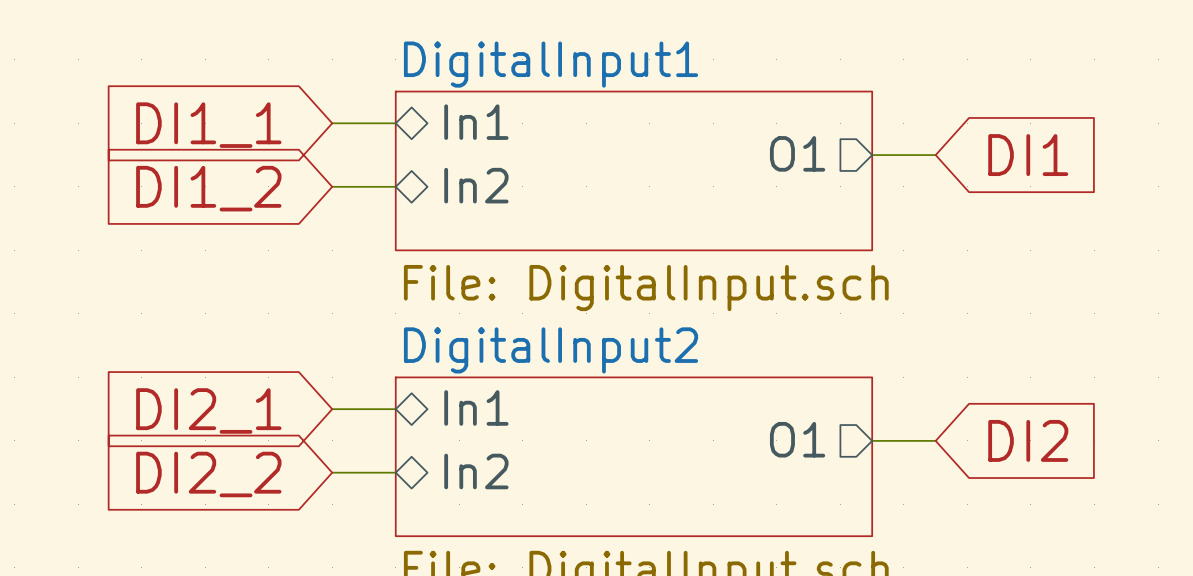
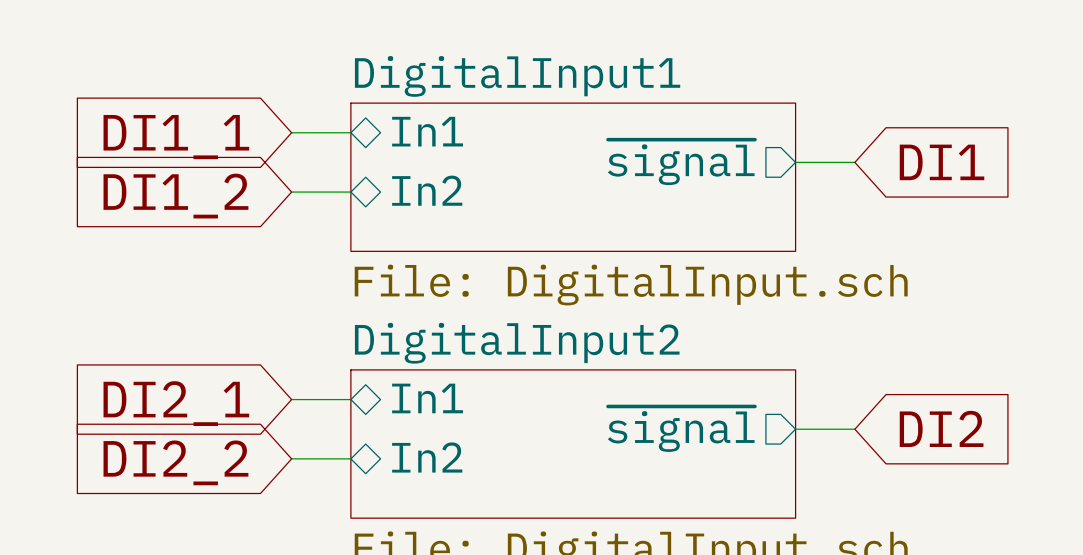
sheet pin: O1 (797, 153) -> ~{signal} (681, 162)
sheet pin: O1 (797, 439) -> ~{signal} (681, 429)

